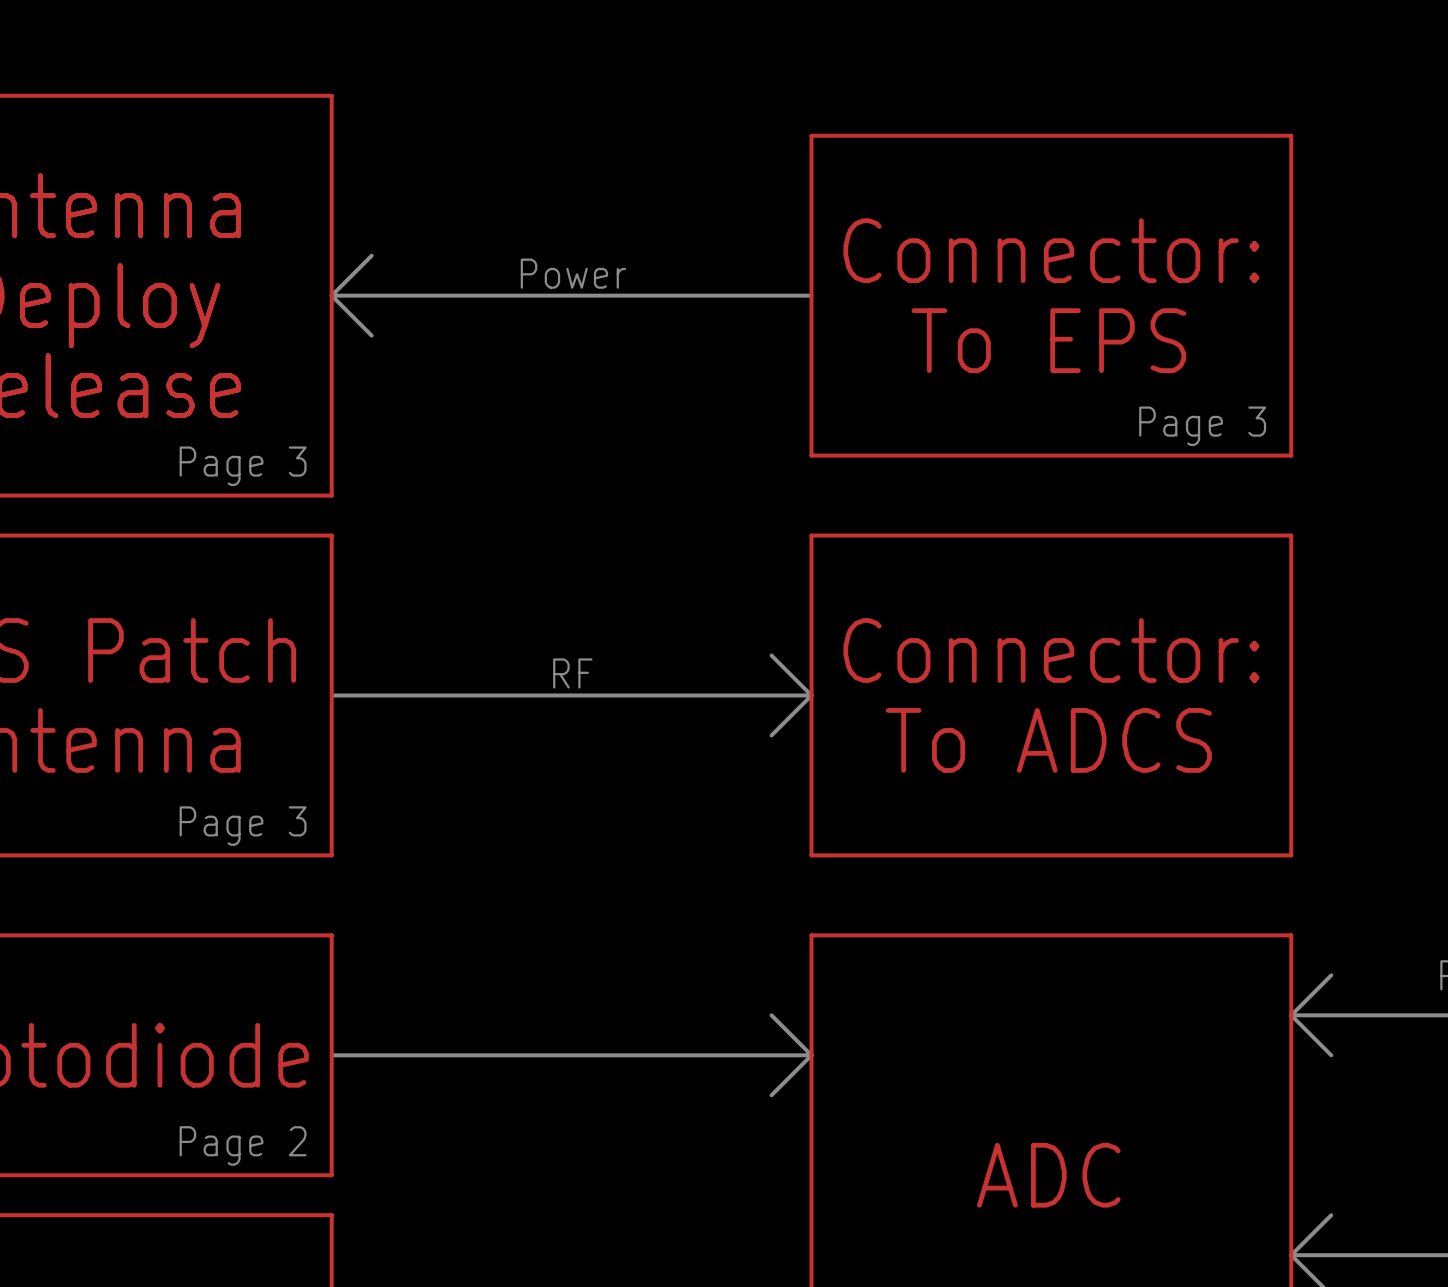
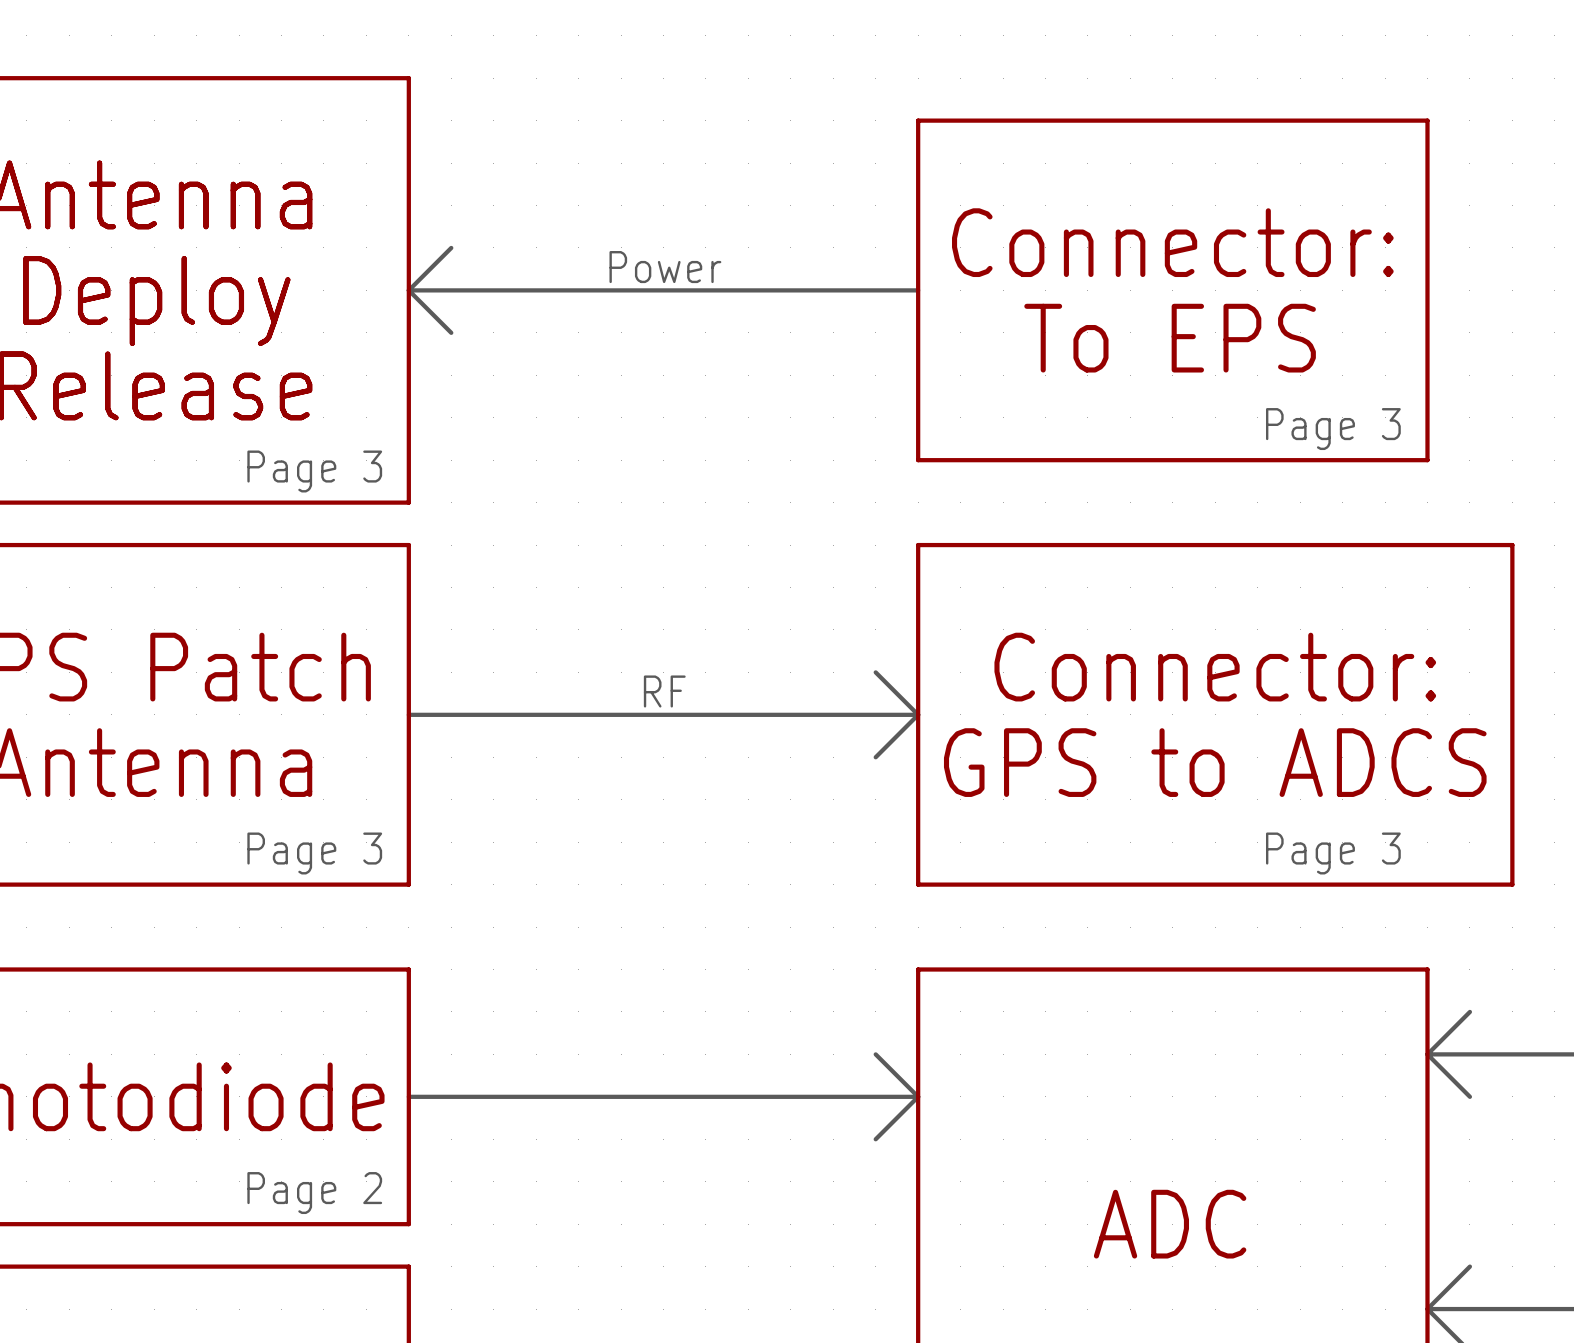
line: (1291, 535) (1291, 855) -> (1427, 545) (1512, 545) (1512, 884) (1427, 884)
text position: Connector: (1051, 650) -> Connector: (1215, 667)
text: To ADCS (1048, 740) -> GPS to ADCS (1215, 762)
text: none -> Page 3 (1333, 853)

